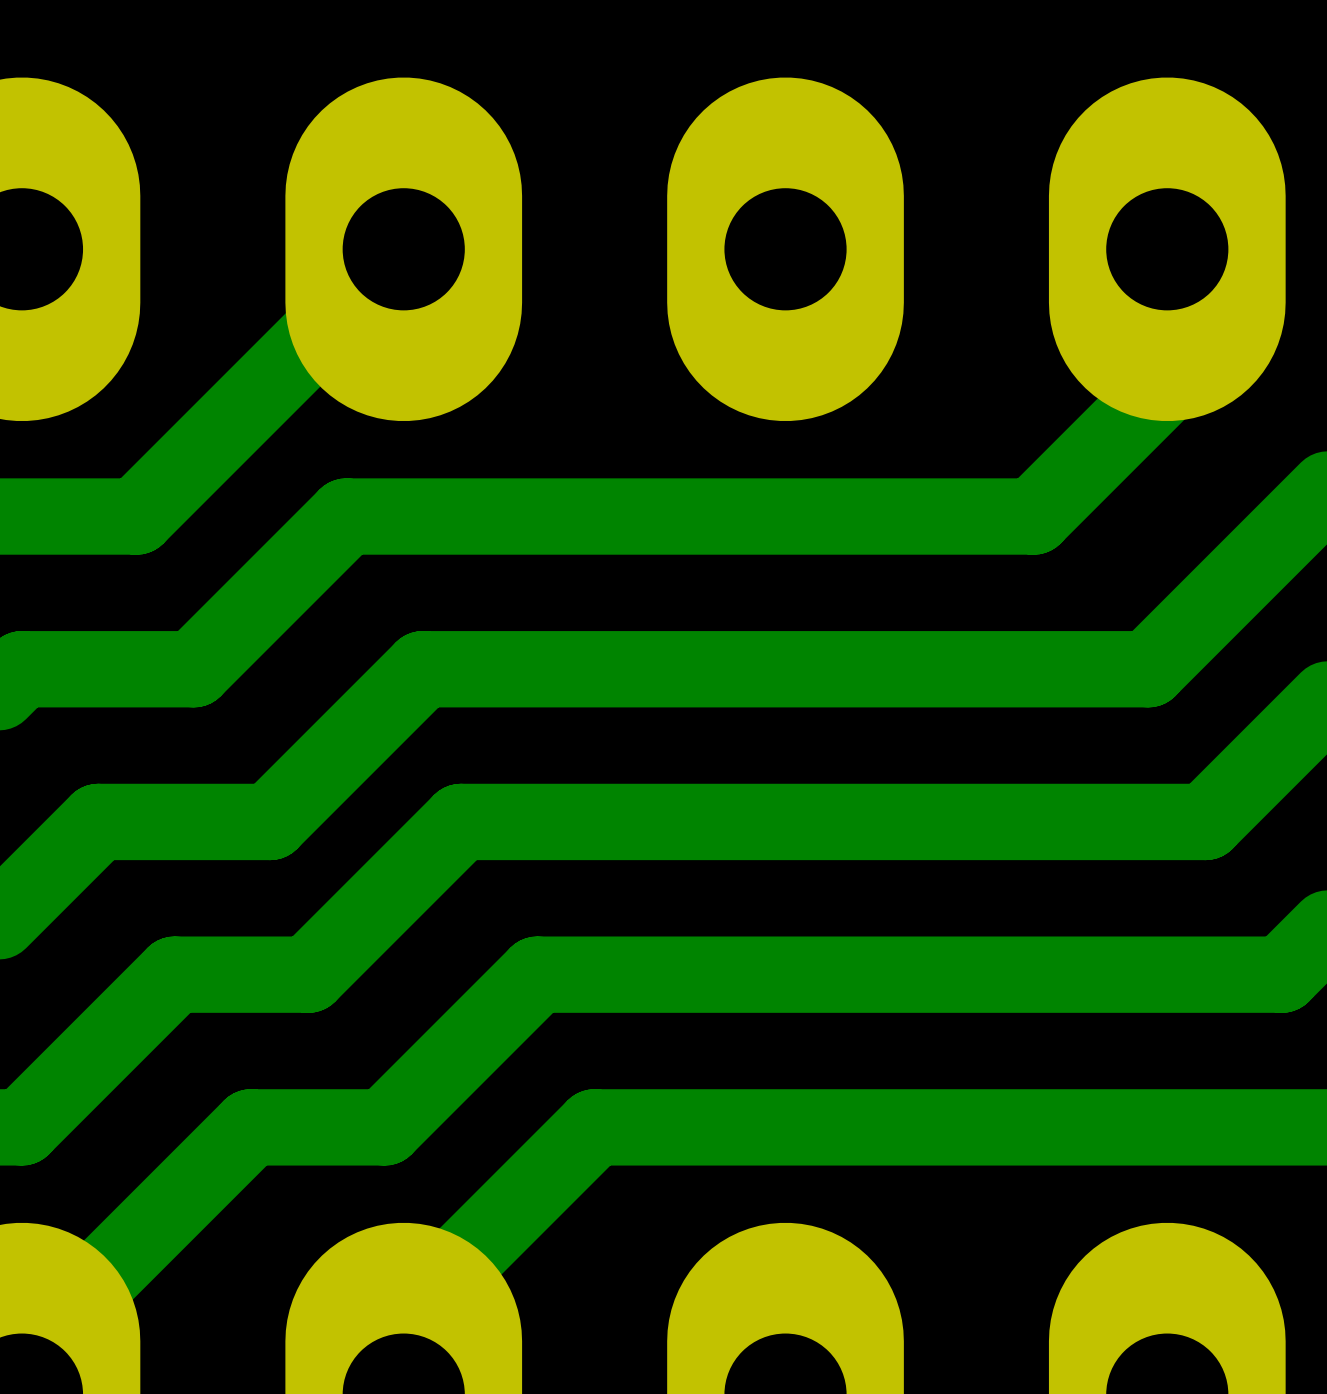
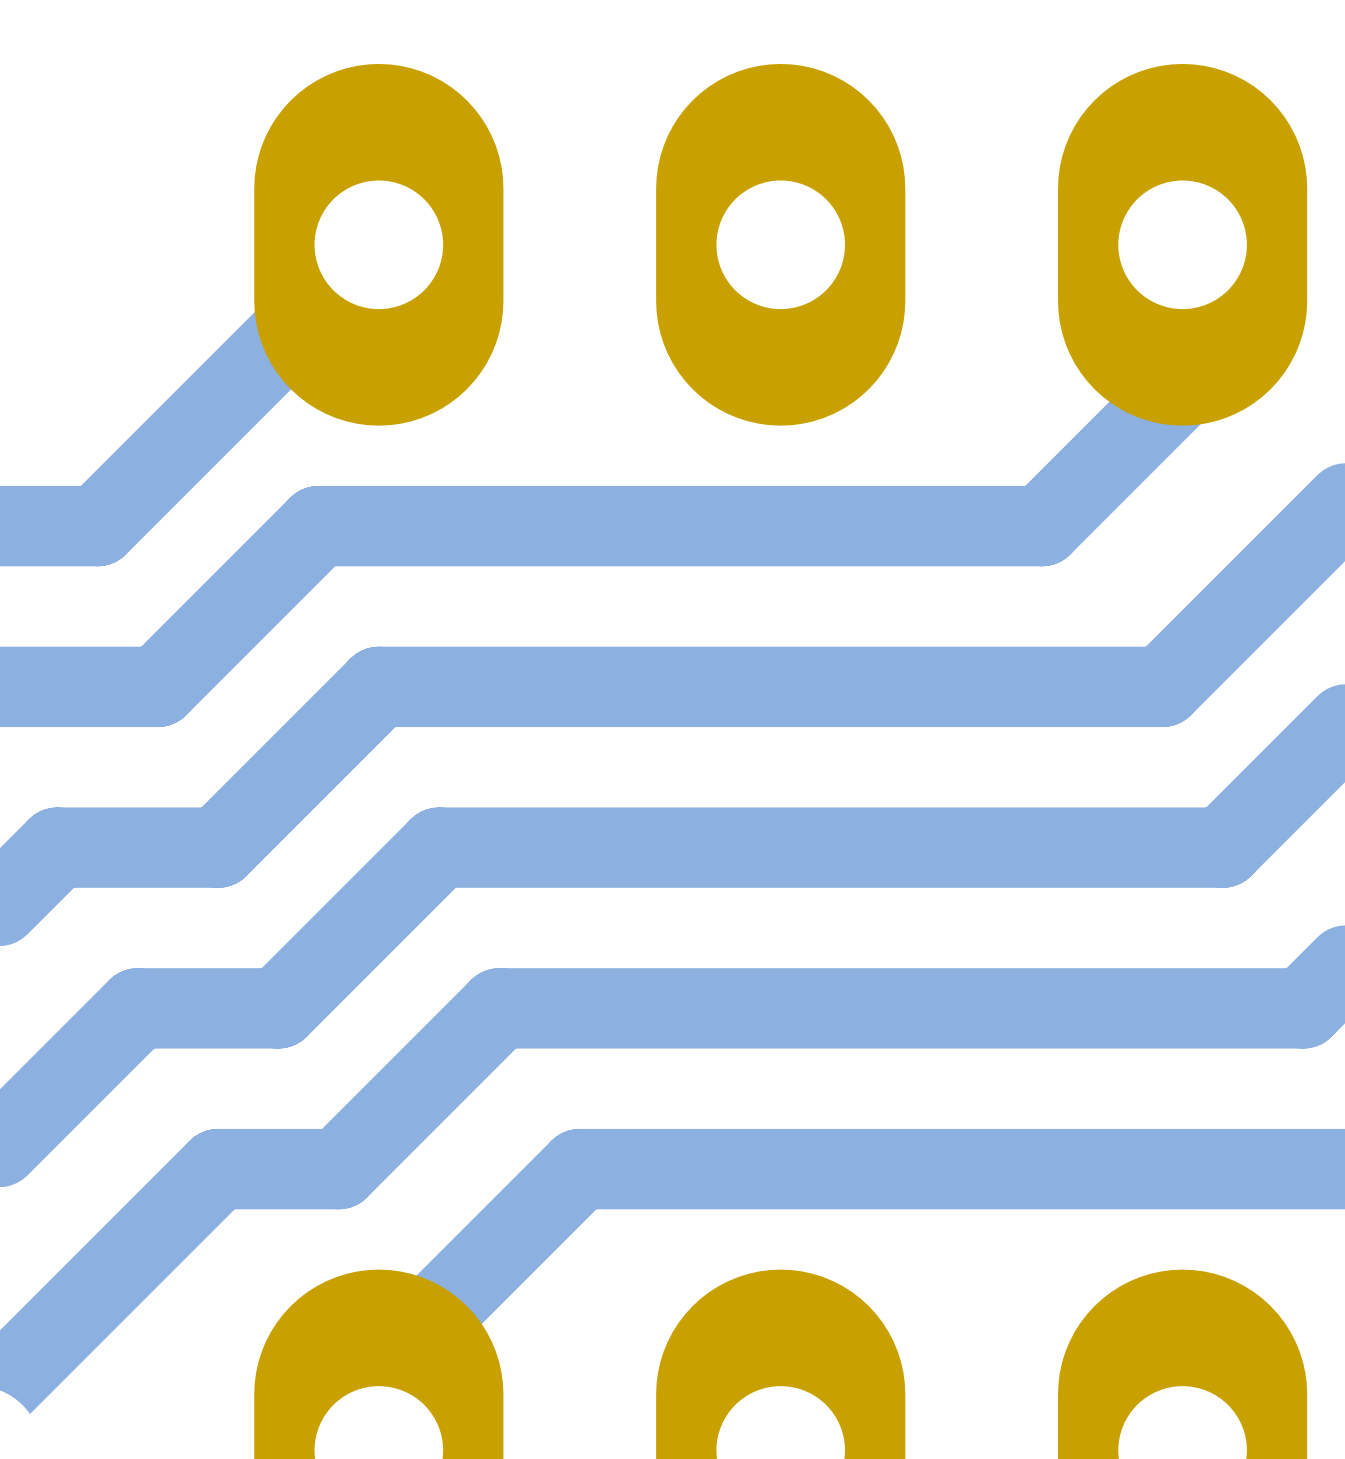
bottom track: (422, 669) (270, 821) (251, 821) -> (398, 686) (378, 686) (218, 847)
bottom track: (537, 974) (384, 1127) (365, 1127) -> (519, 1008) (499, 1008) (338, 1169)

